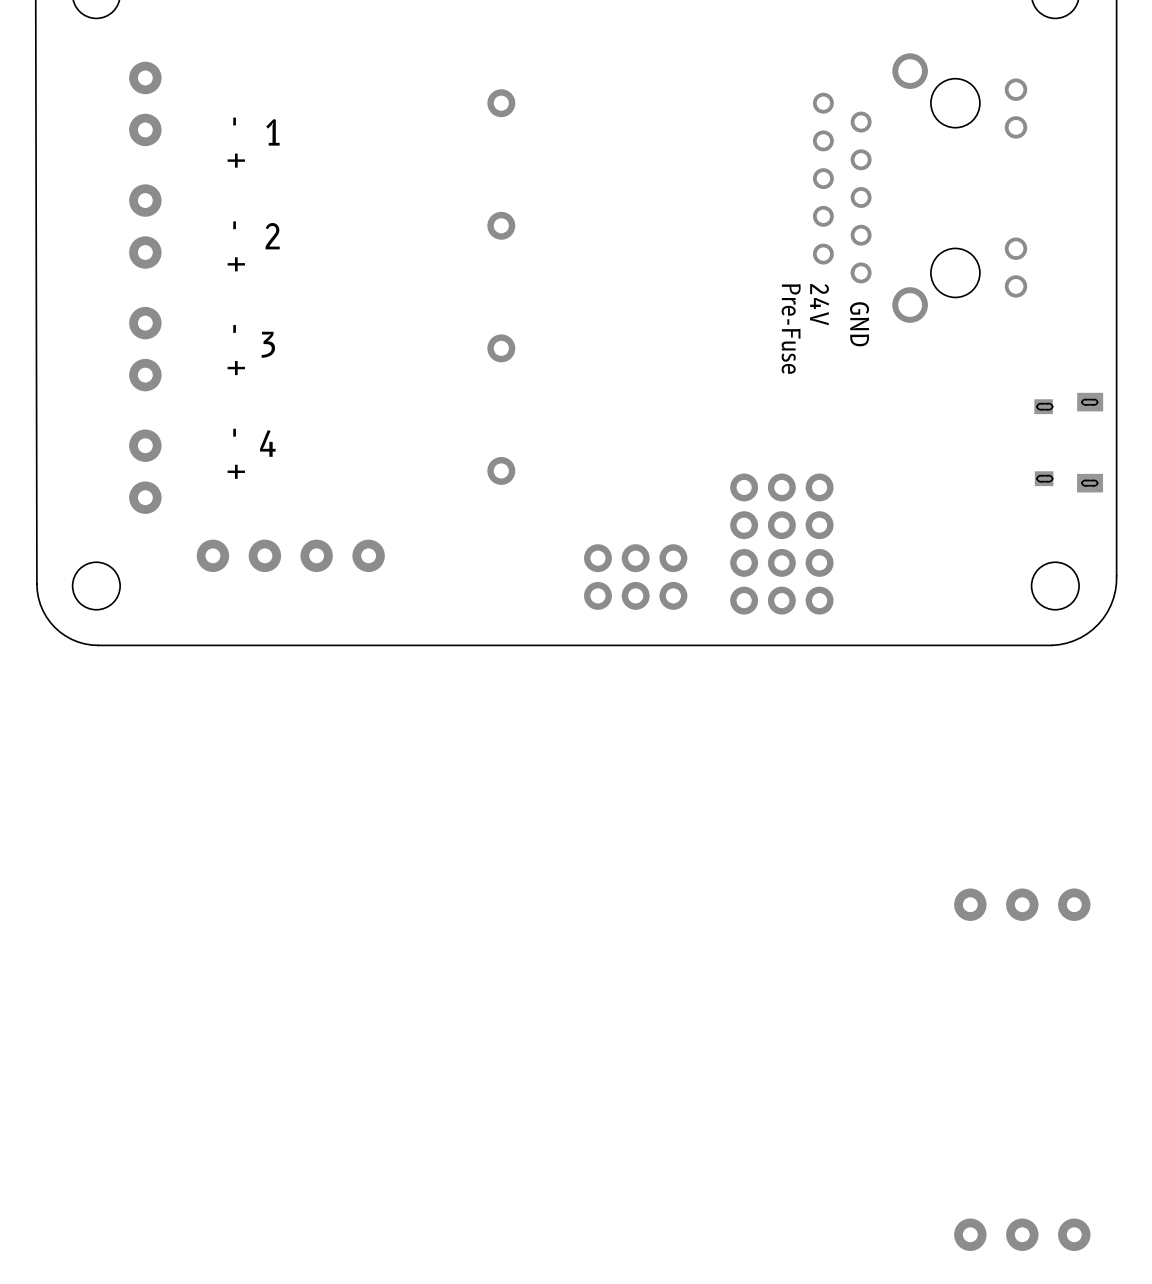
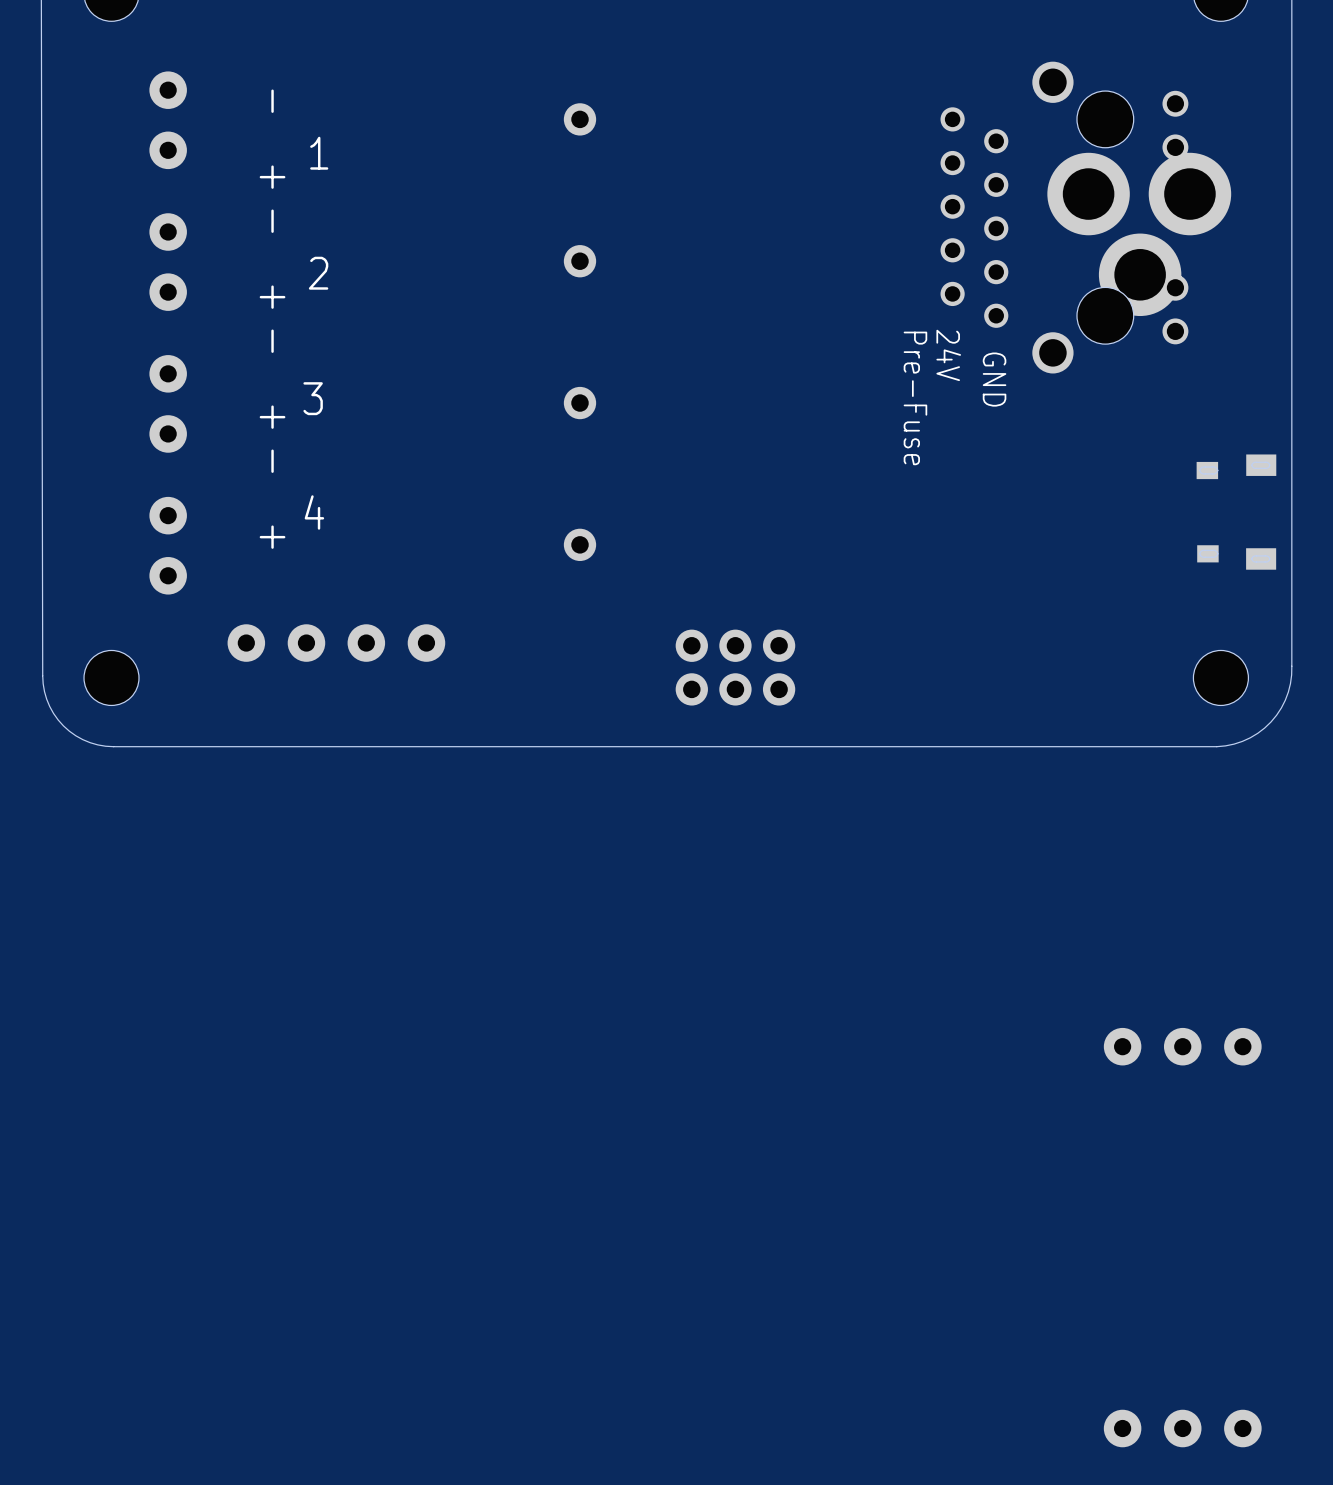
part: none -> (1139, 234)
part: (744, 544) -> none
part: (781, 544) -> none
part: (819, 544) -> none

